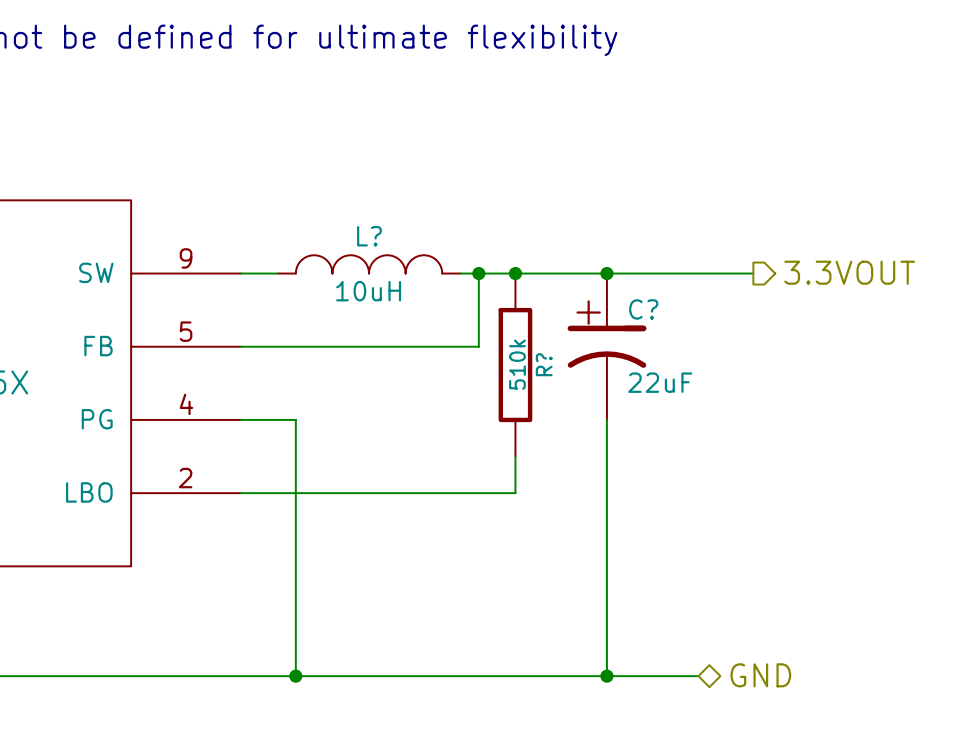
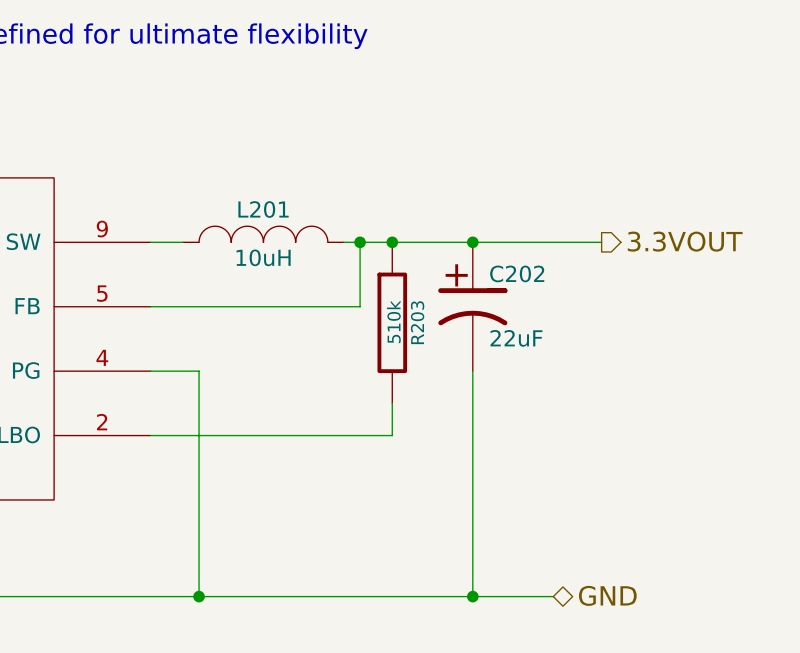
L? name: L? (369, 236) -> L201 (263, 209)
C? name: C? (643, 309) -> C202 (517, 273)
R? name: R? (544, 364) -> R203 (417, 322)

